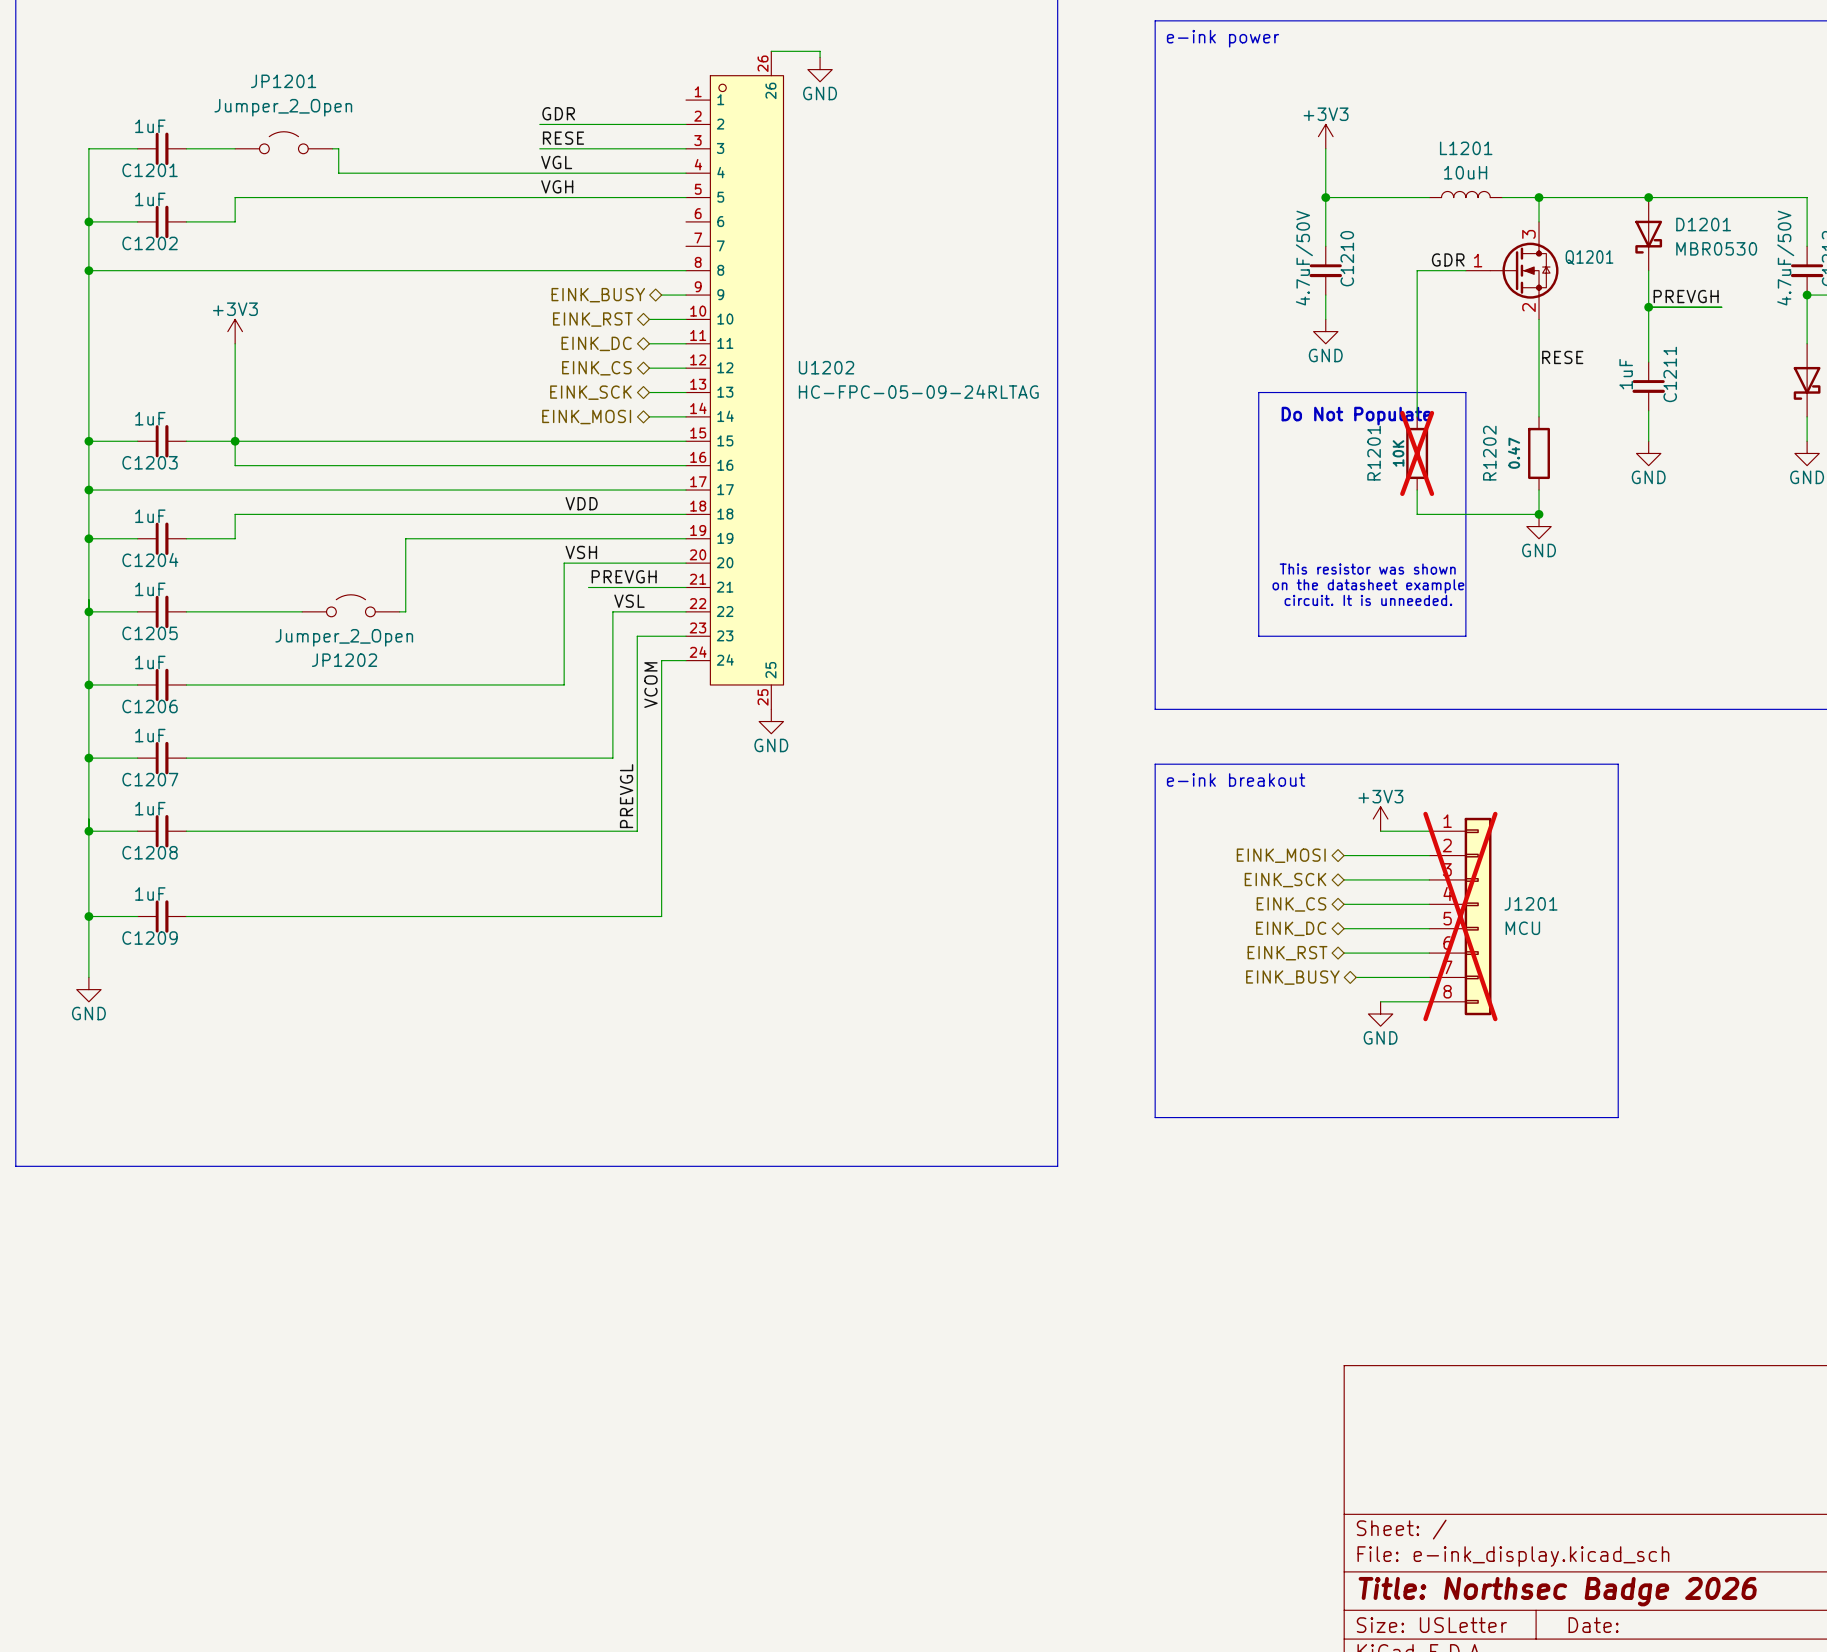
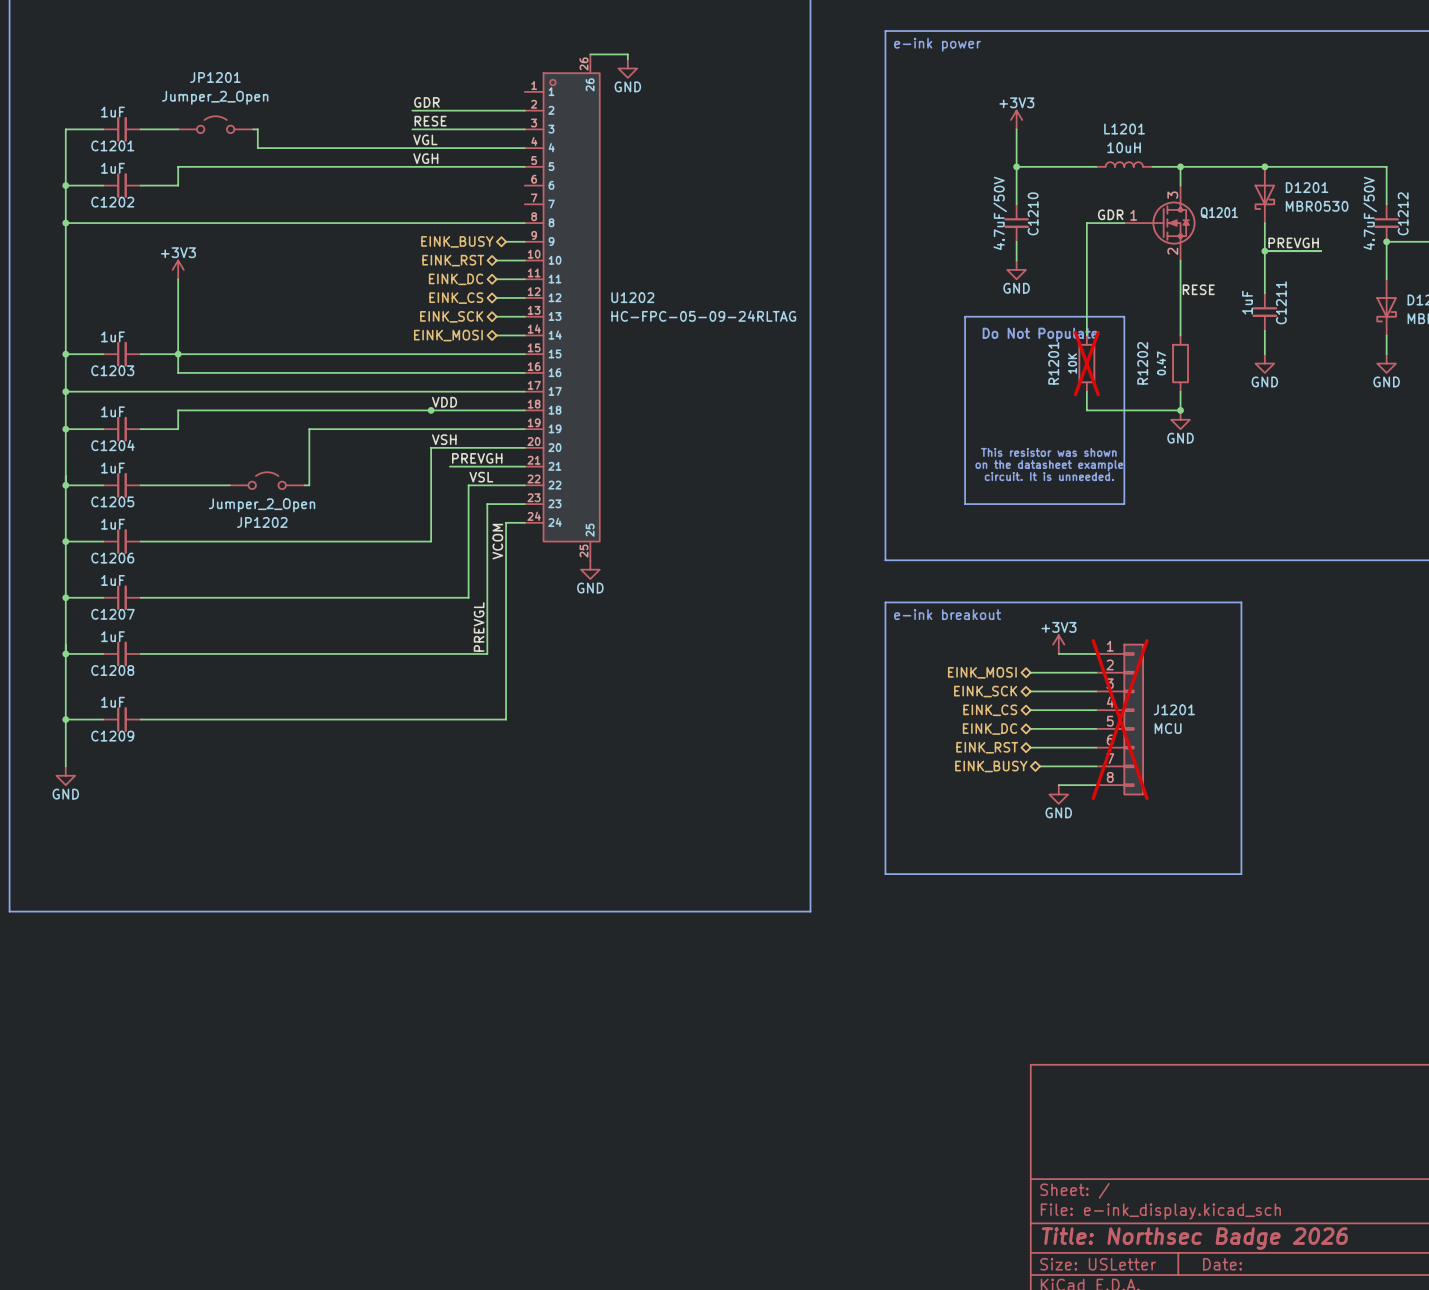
junction: none -> (431, 410)

